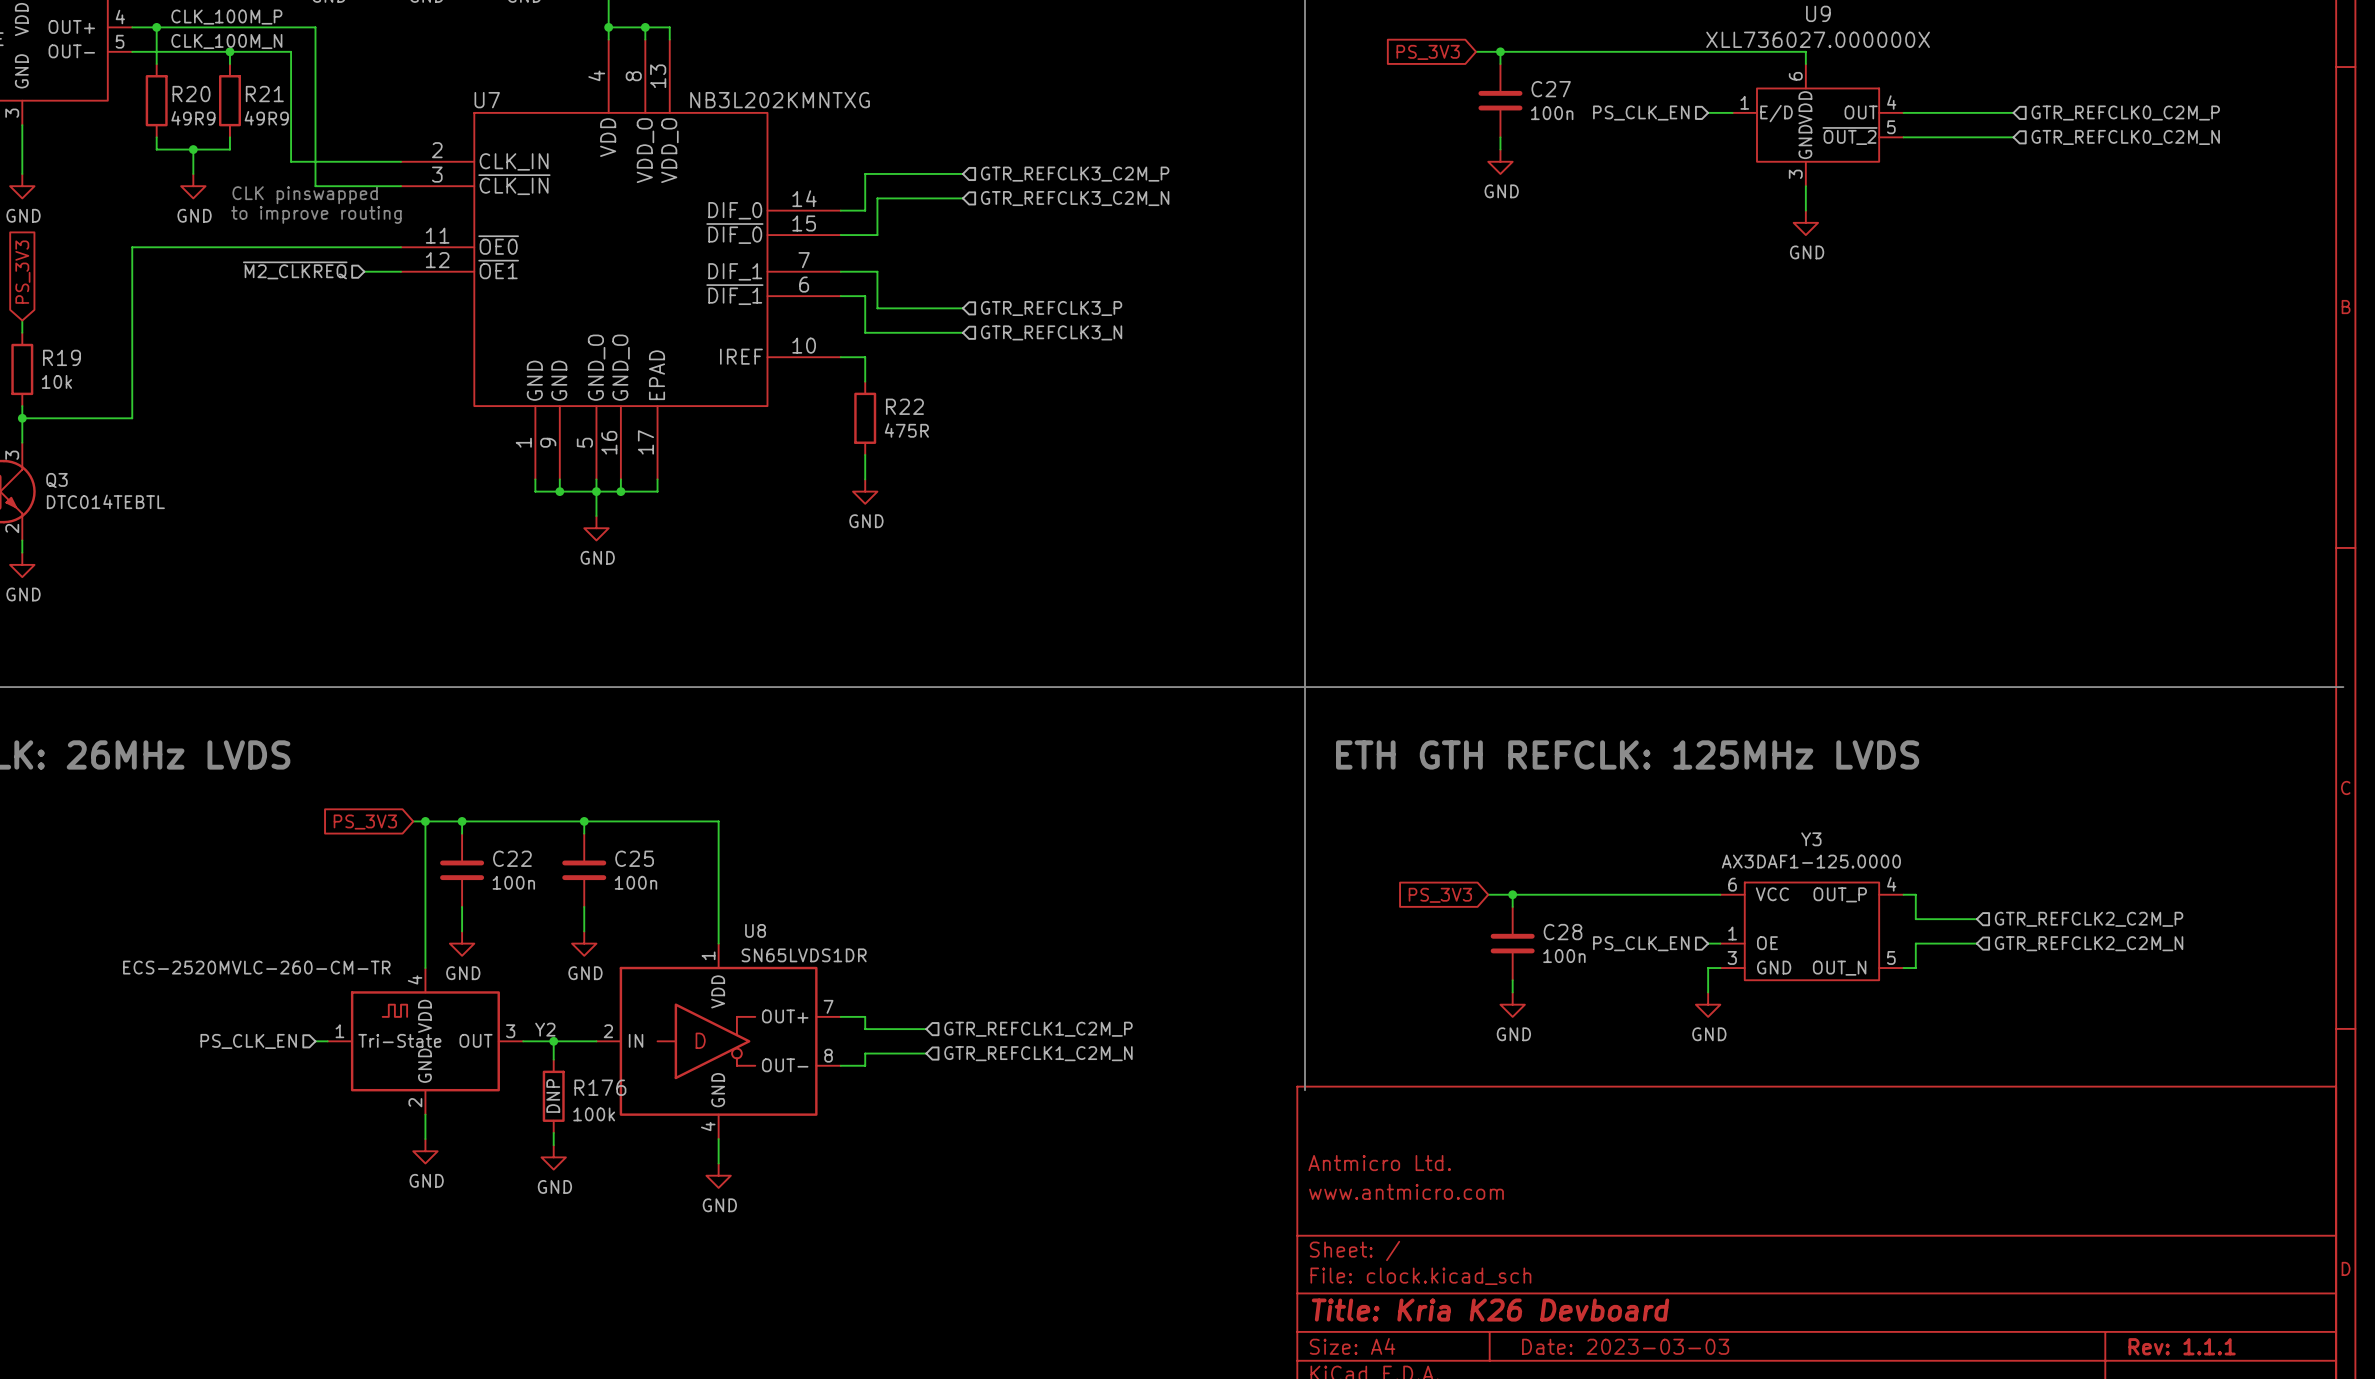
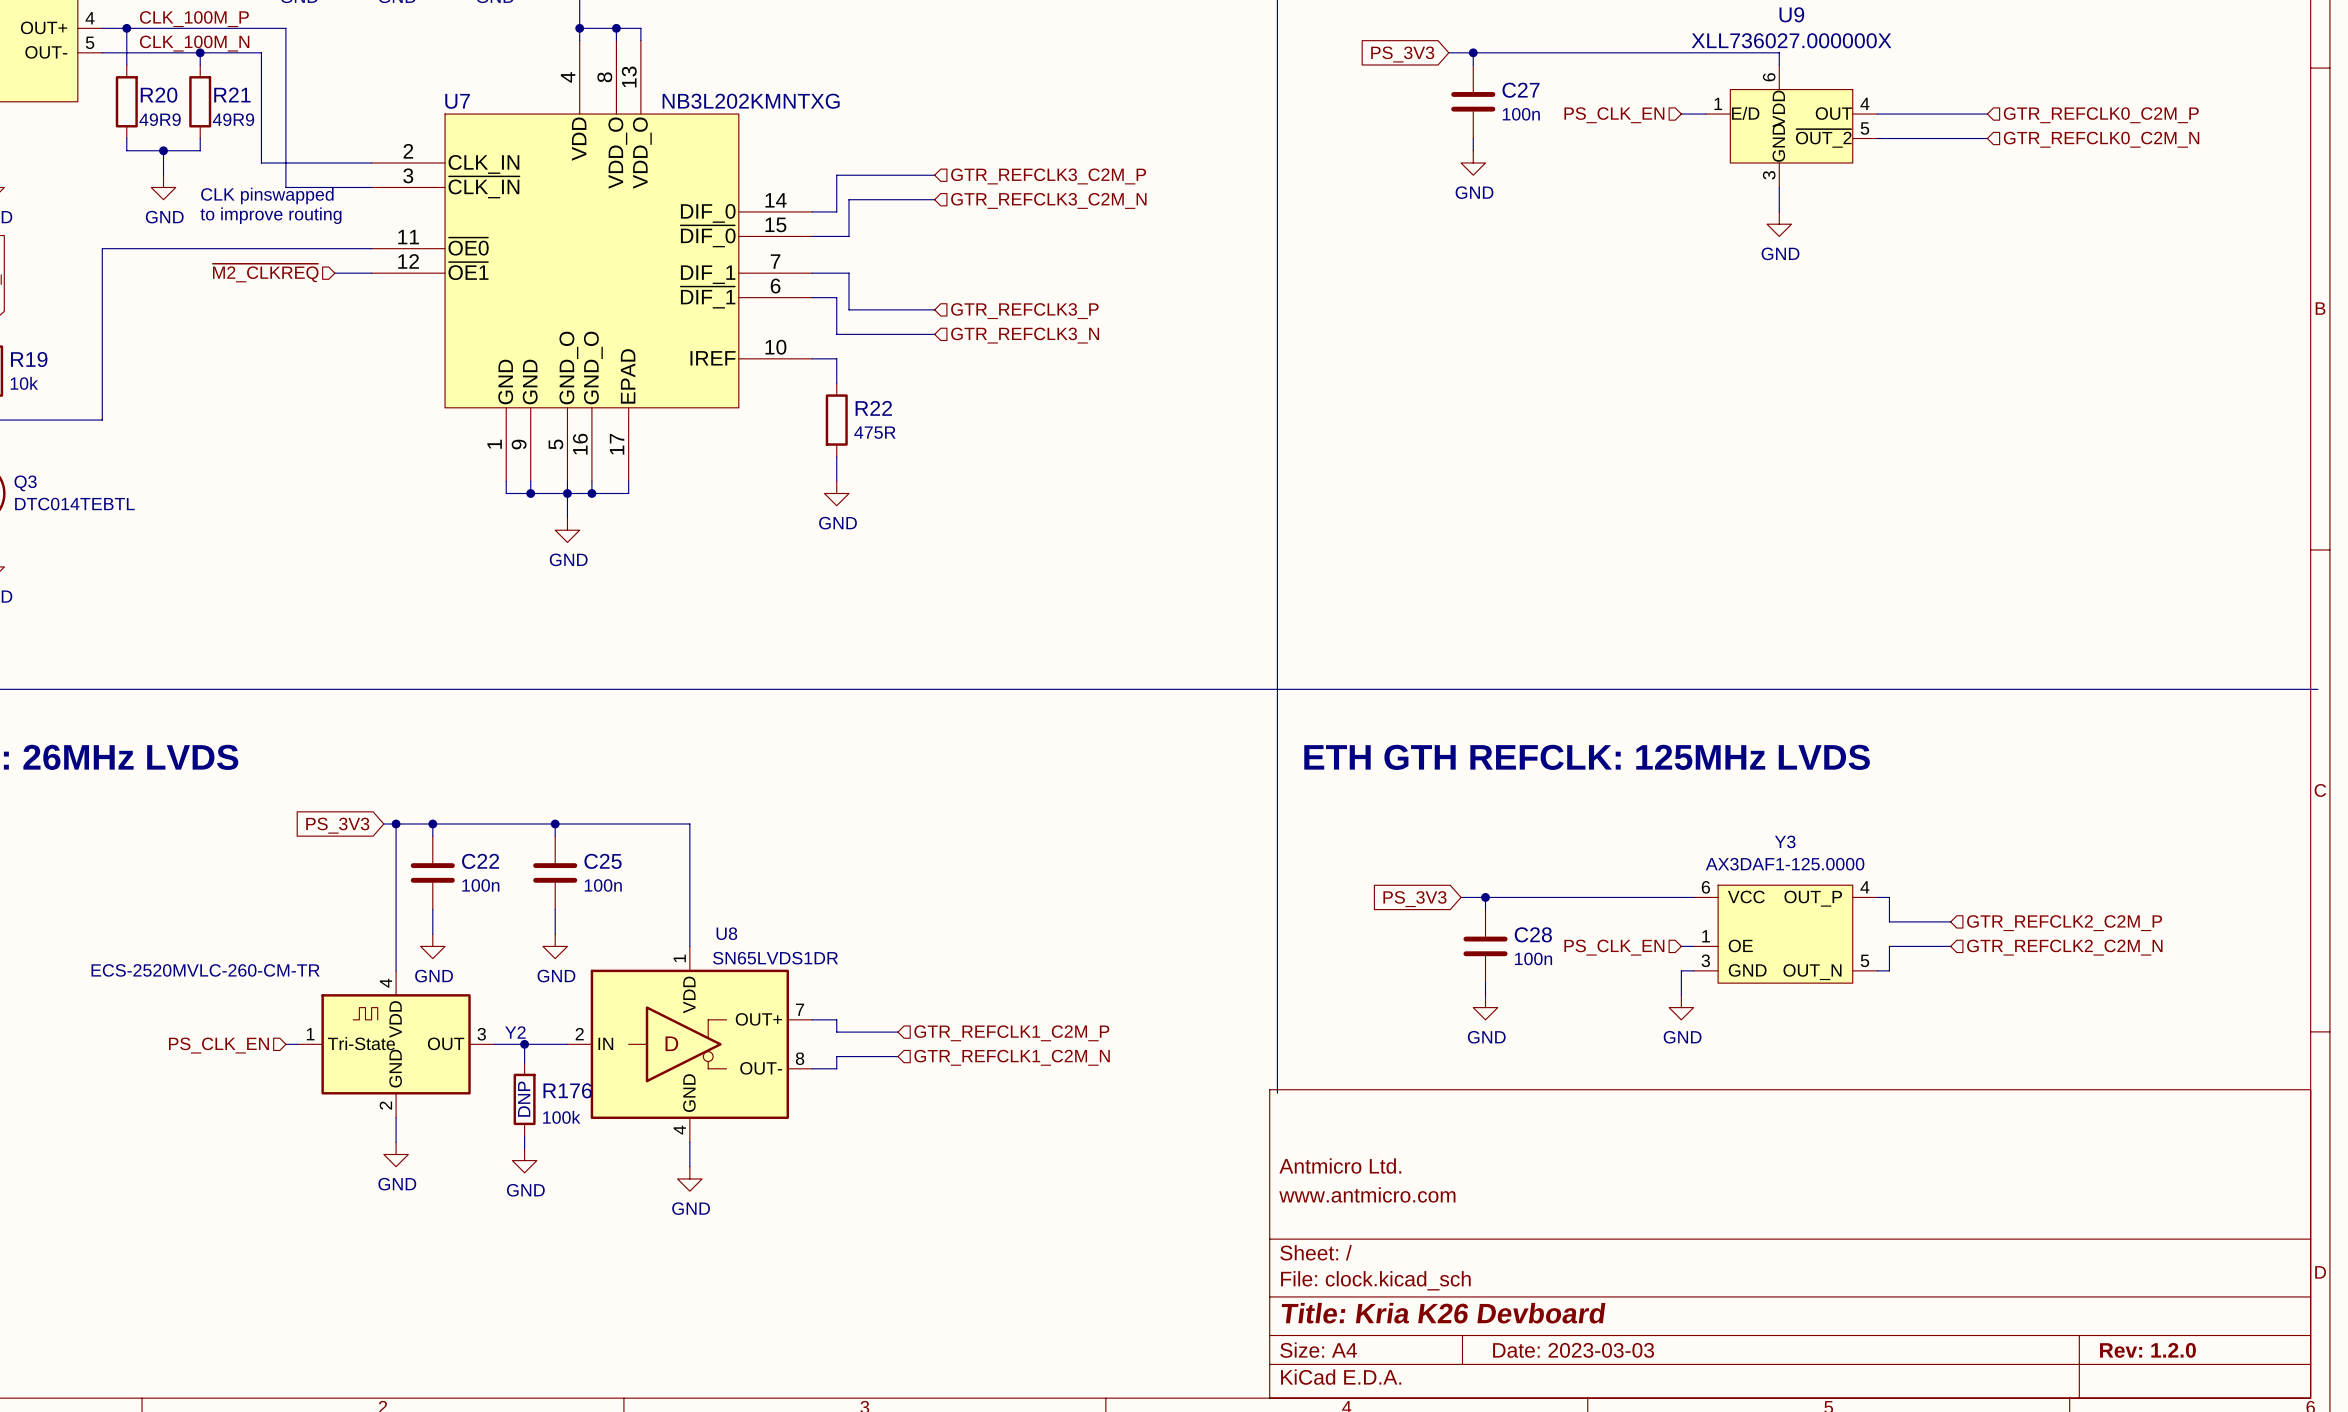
title block: Rev: 1.1.1 (2182, 1346) -> Rev: 1.2.0 (2147, 1350)

